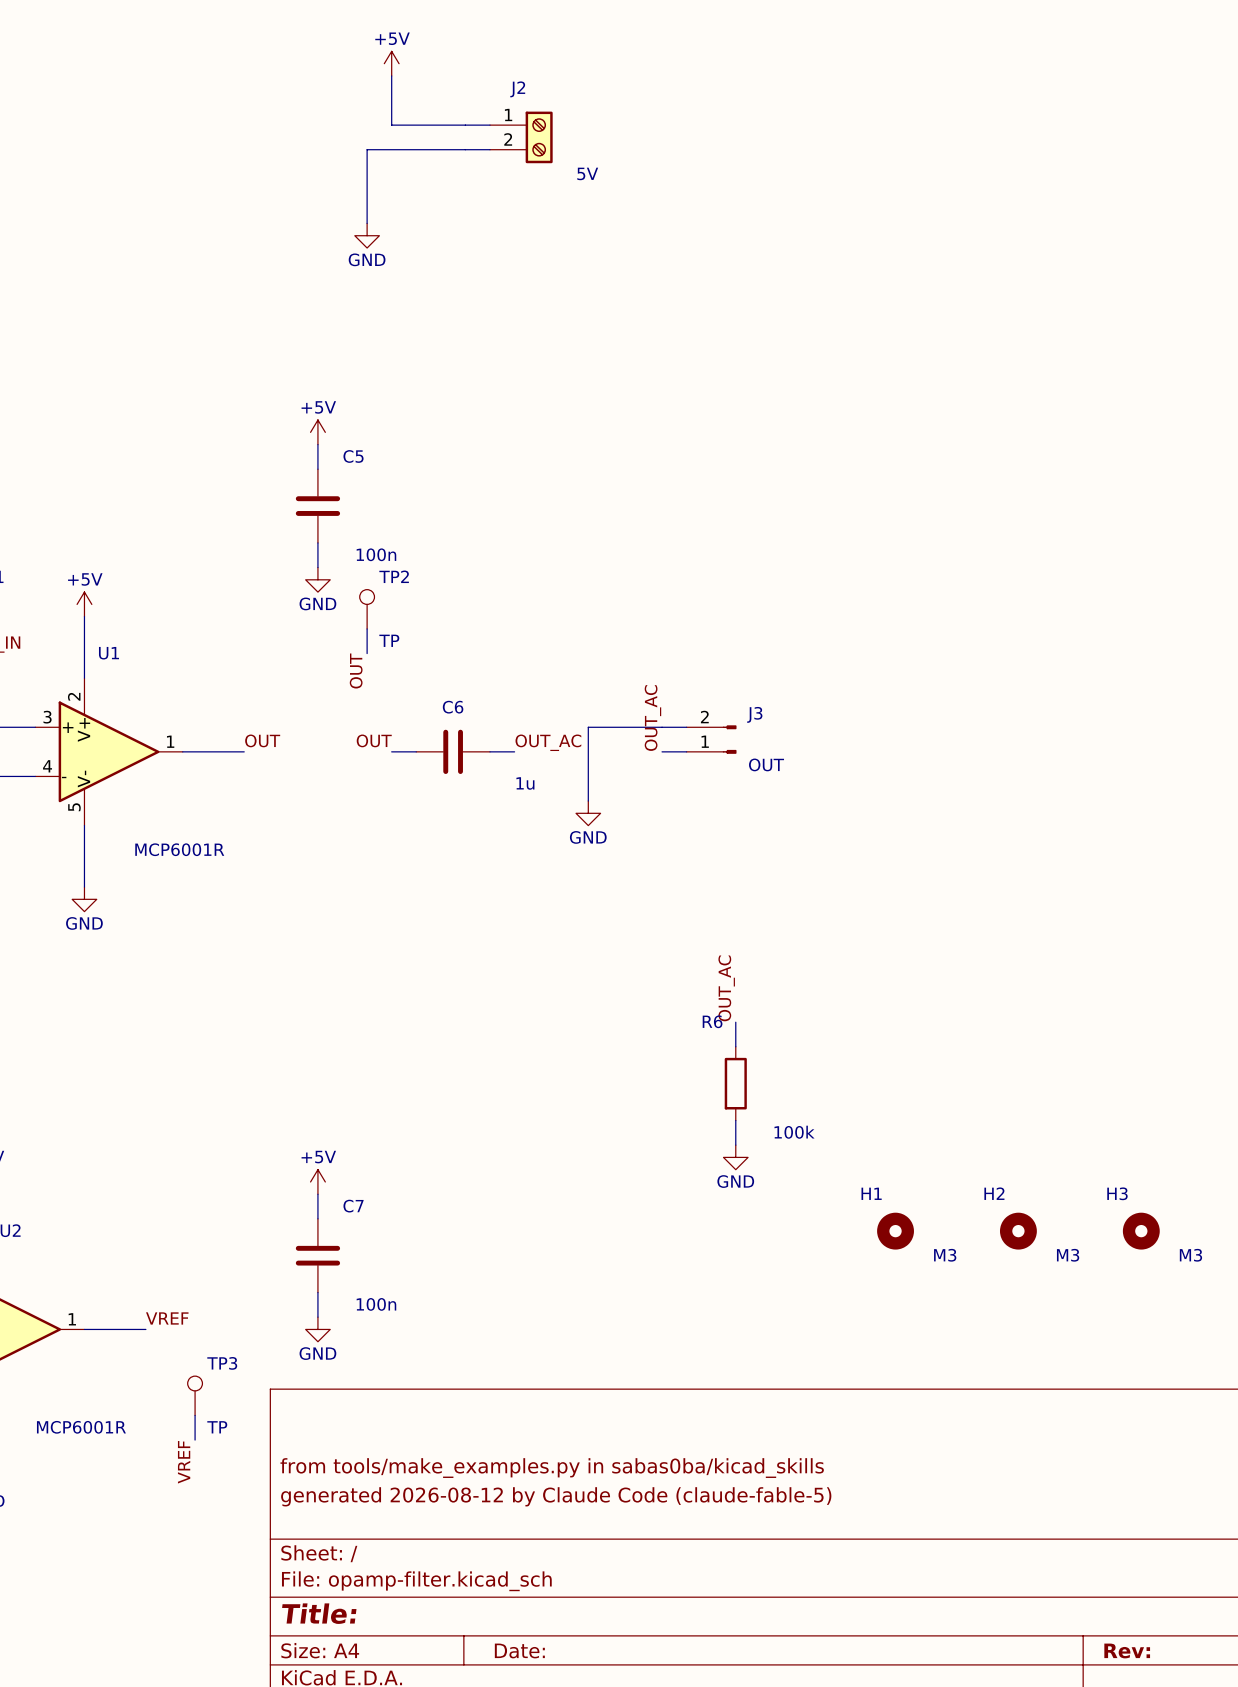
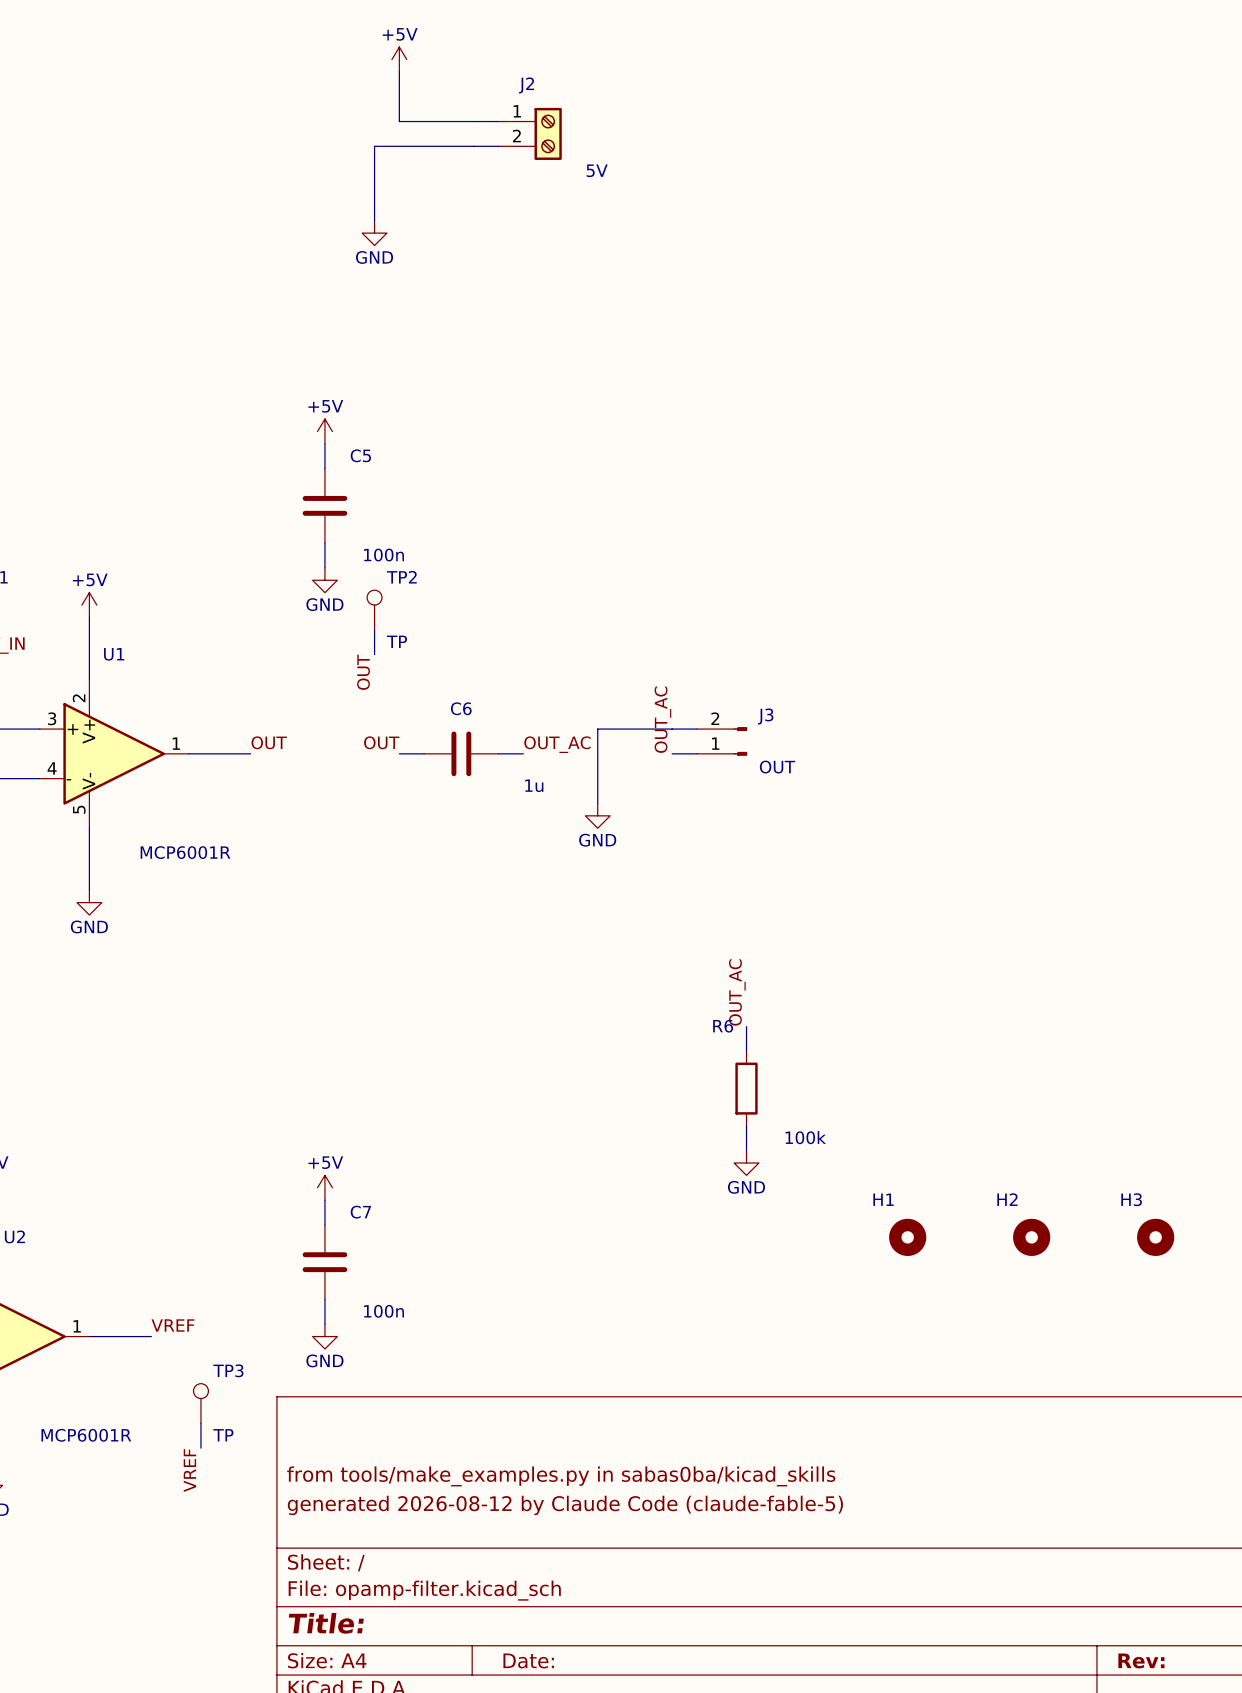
H1 value: M3 (945, 1255) -> none
H2 value: M3 (1068, 1255) -> none
H3 value: M3 (1190, 1255) -> none

